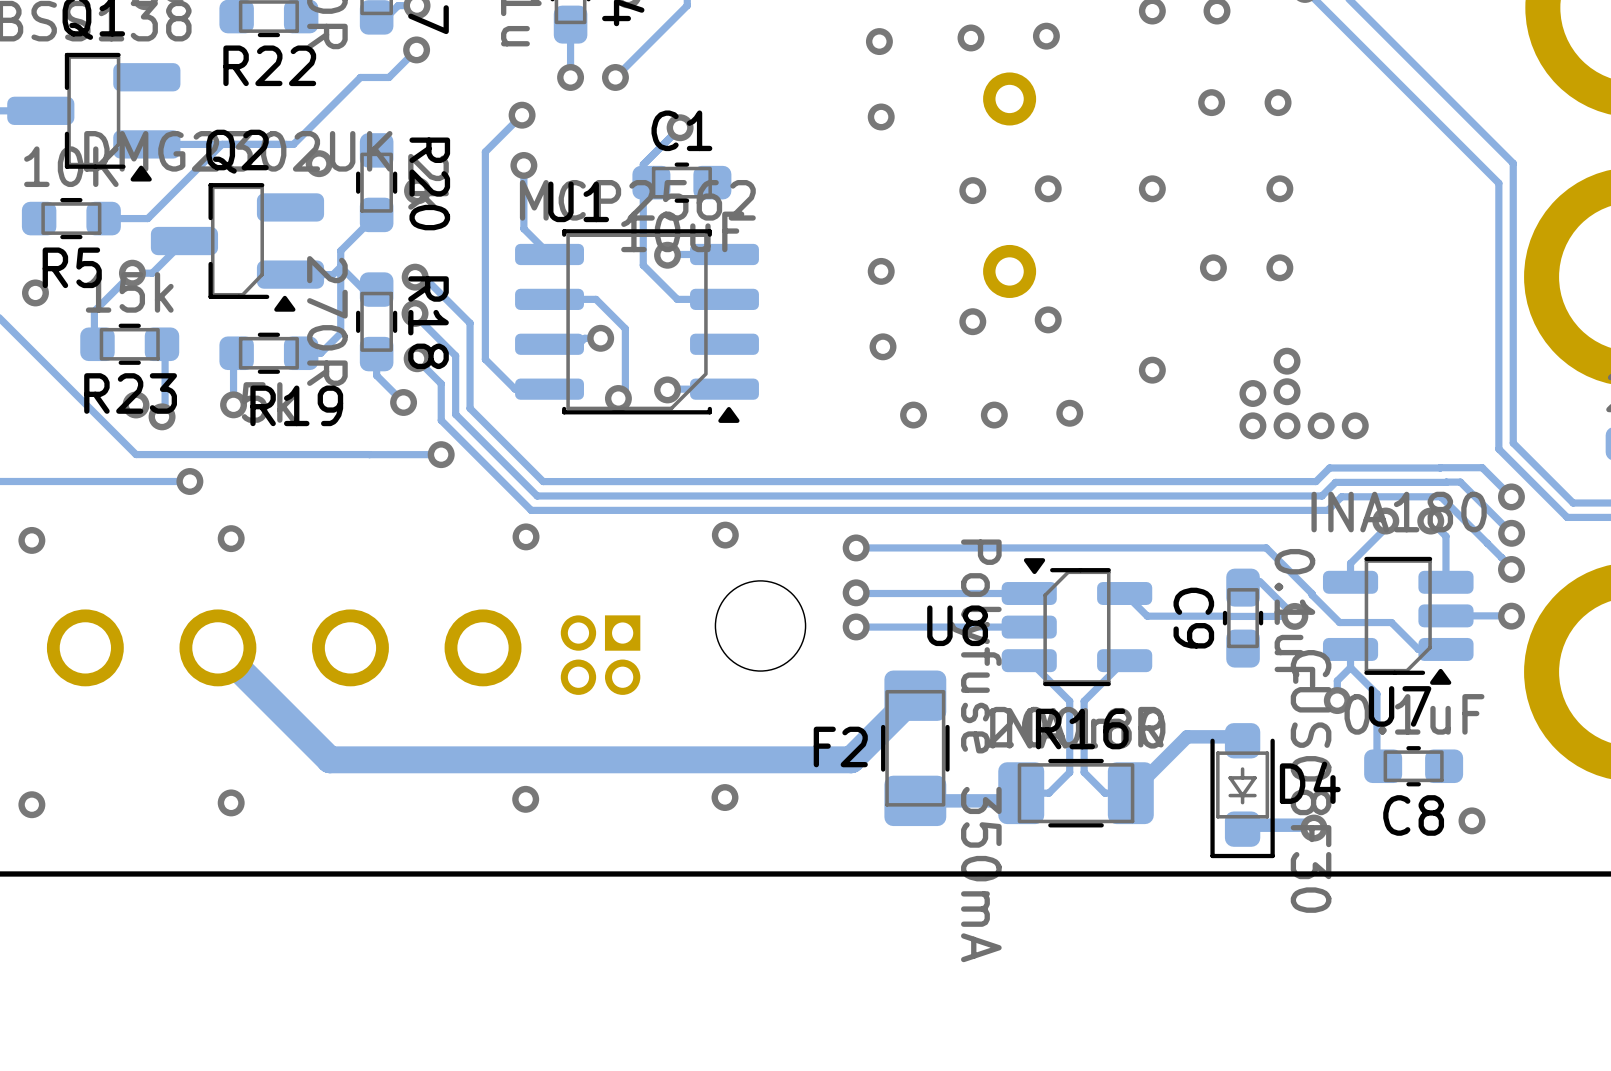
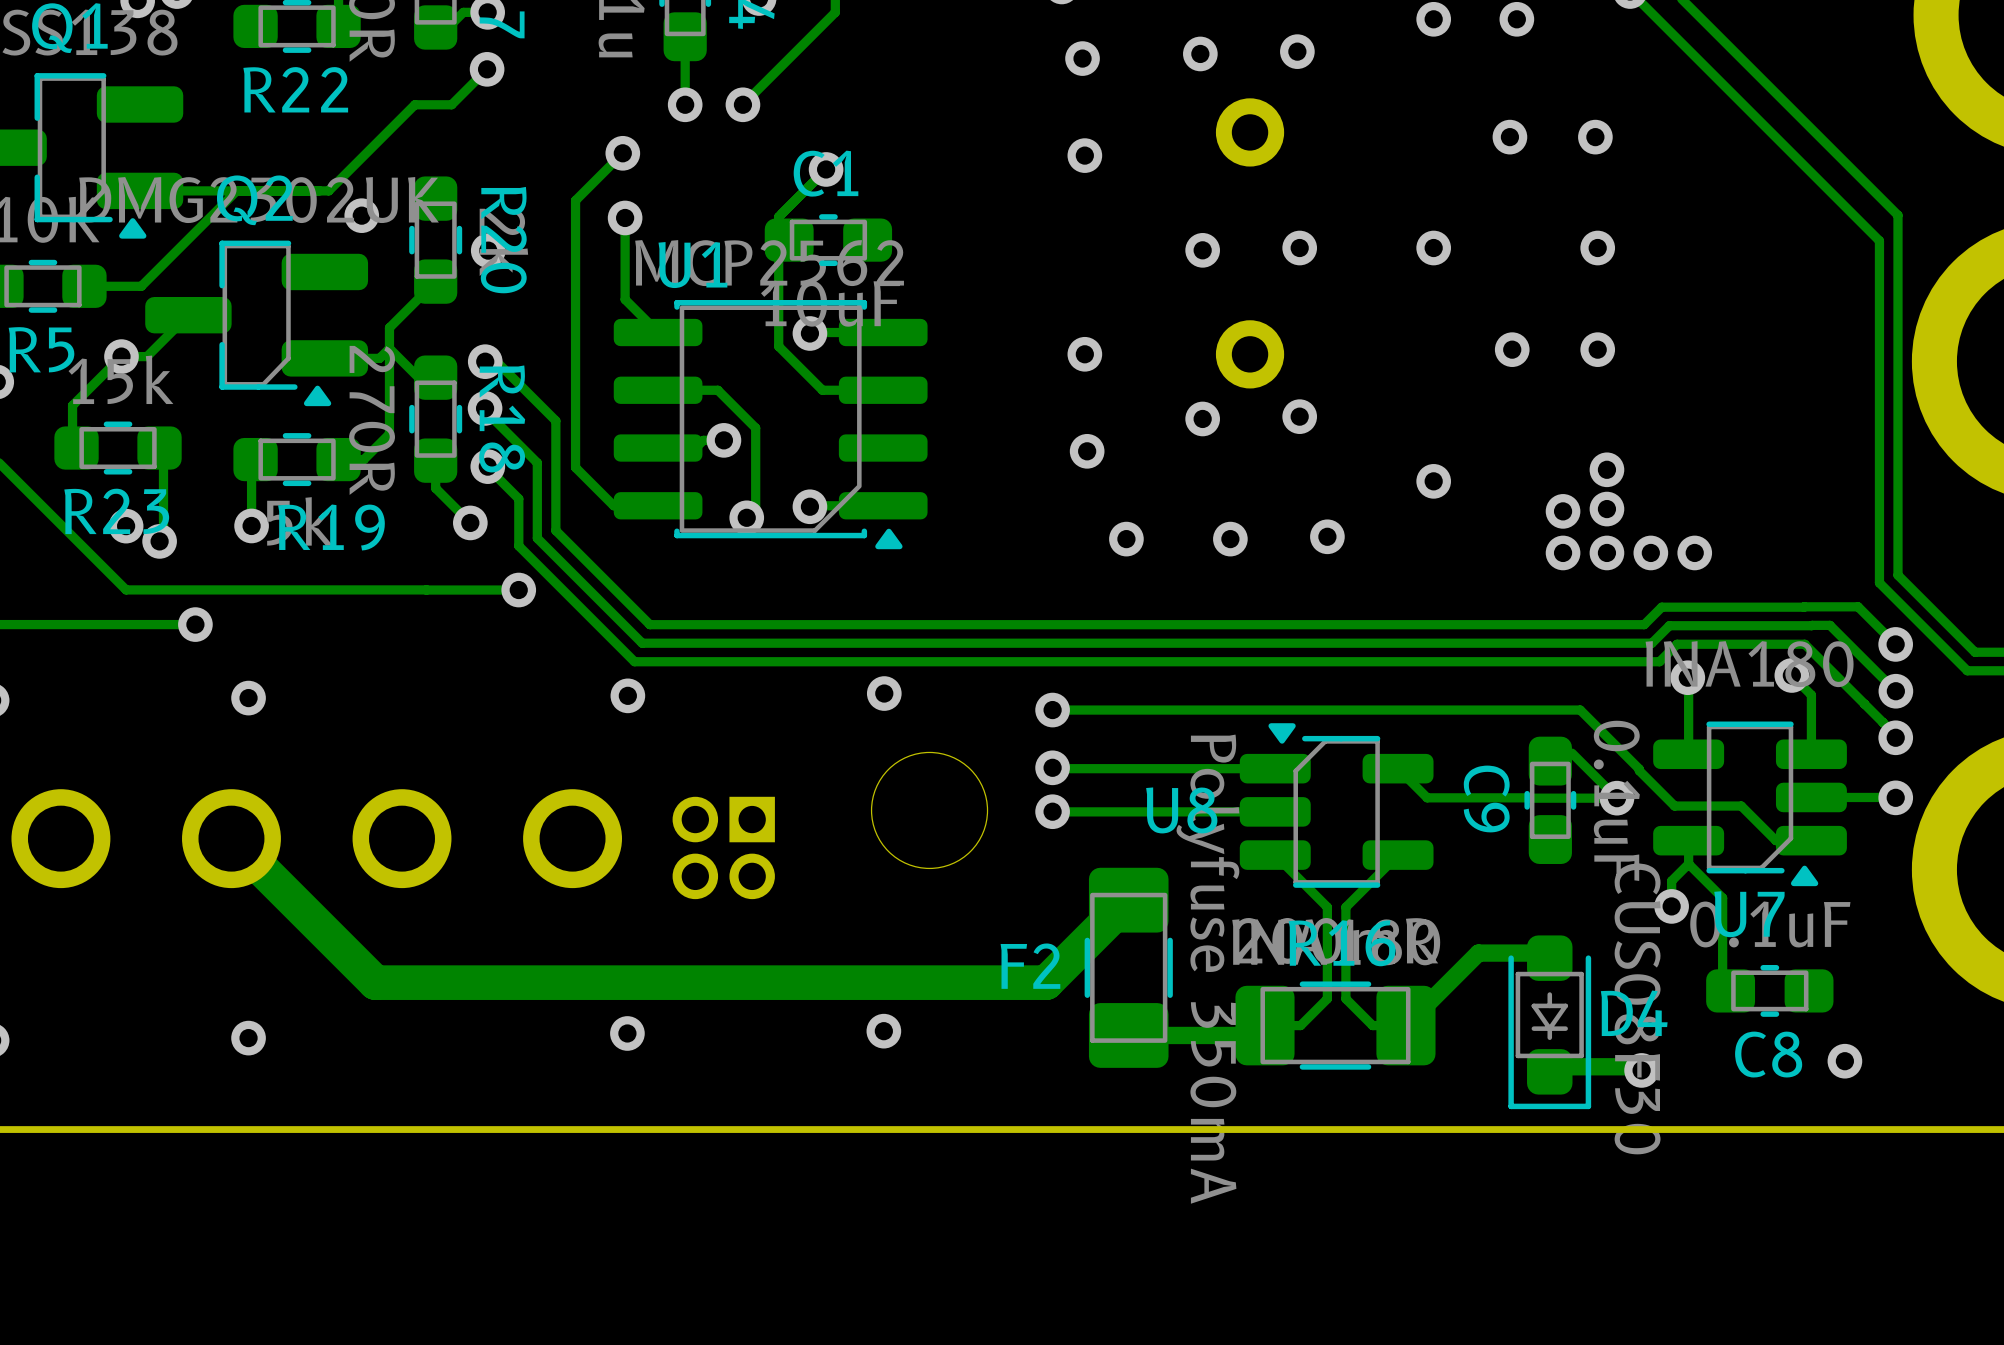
track: (1385, 521) (1385, 528) (1350, 563) -> (1687, 677) (1688, 730)
via position: (1385, 521) -> (1687, 677)

